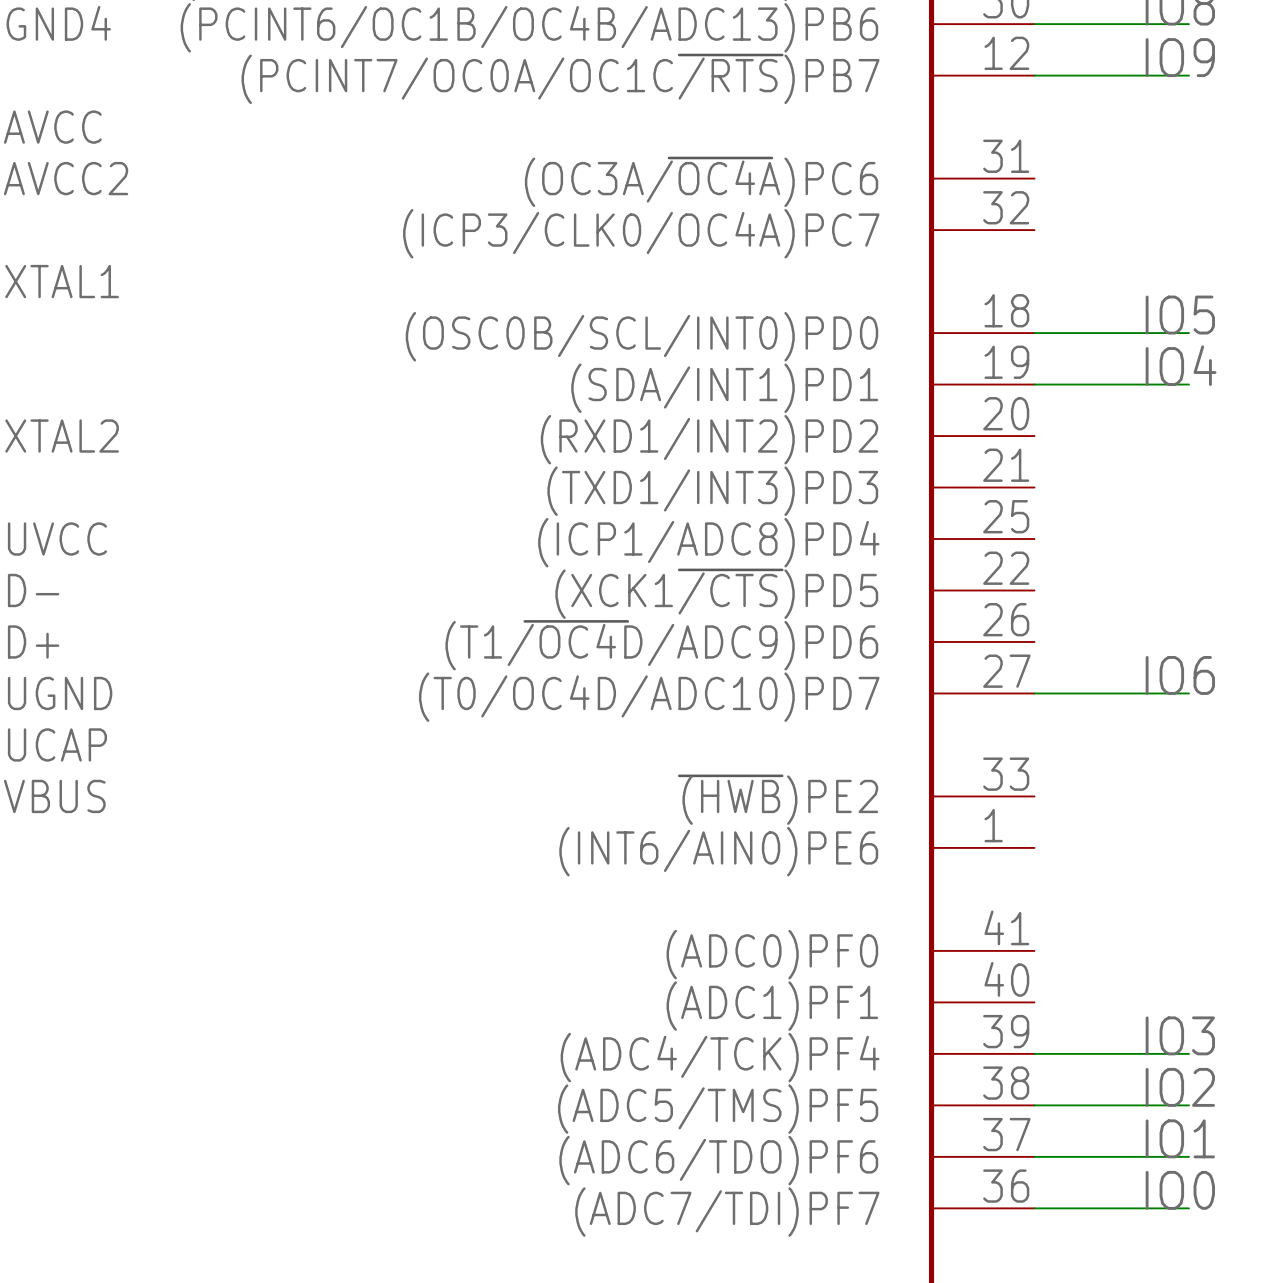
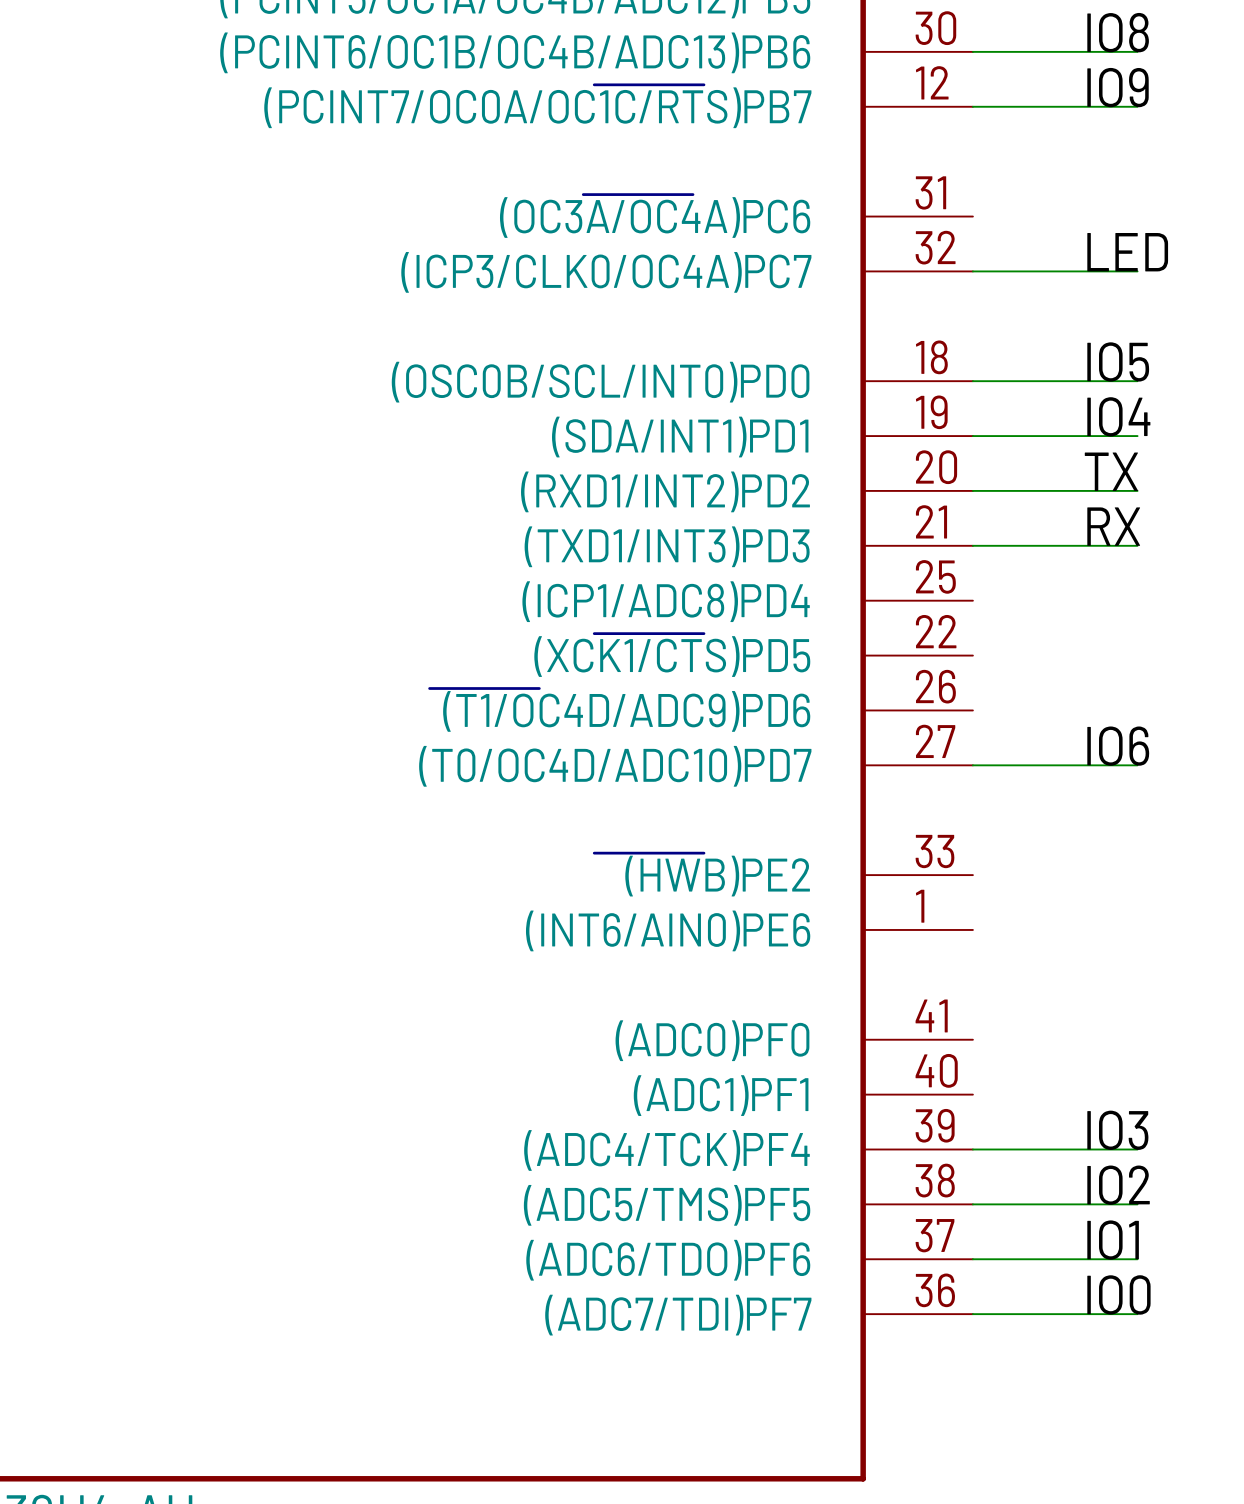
label: none -> LED (1127, 252)
wire: none -> (972, 271) (1137, 271)
label: none -> TX (1111, 471)
wire: none -> (972, 490) (1137, 490)
label: none -> RX (1113, 526)
wire: none -> (972, 545) (1137, 545)

